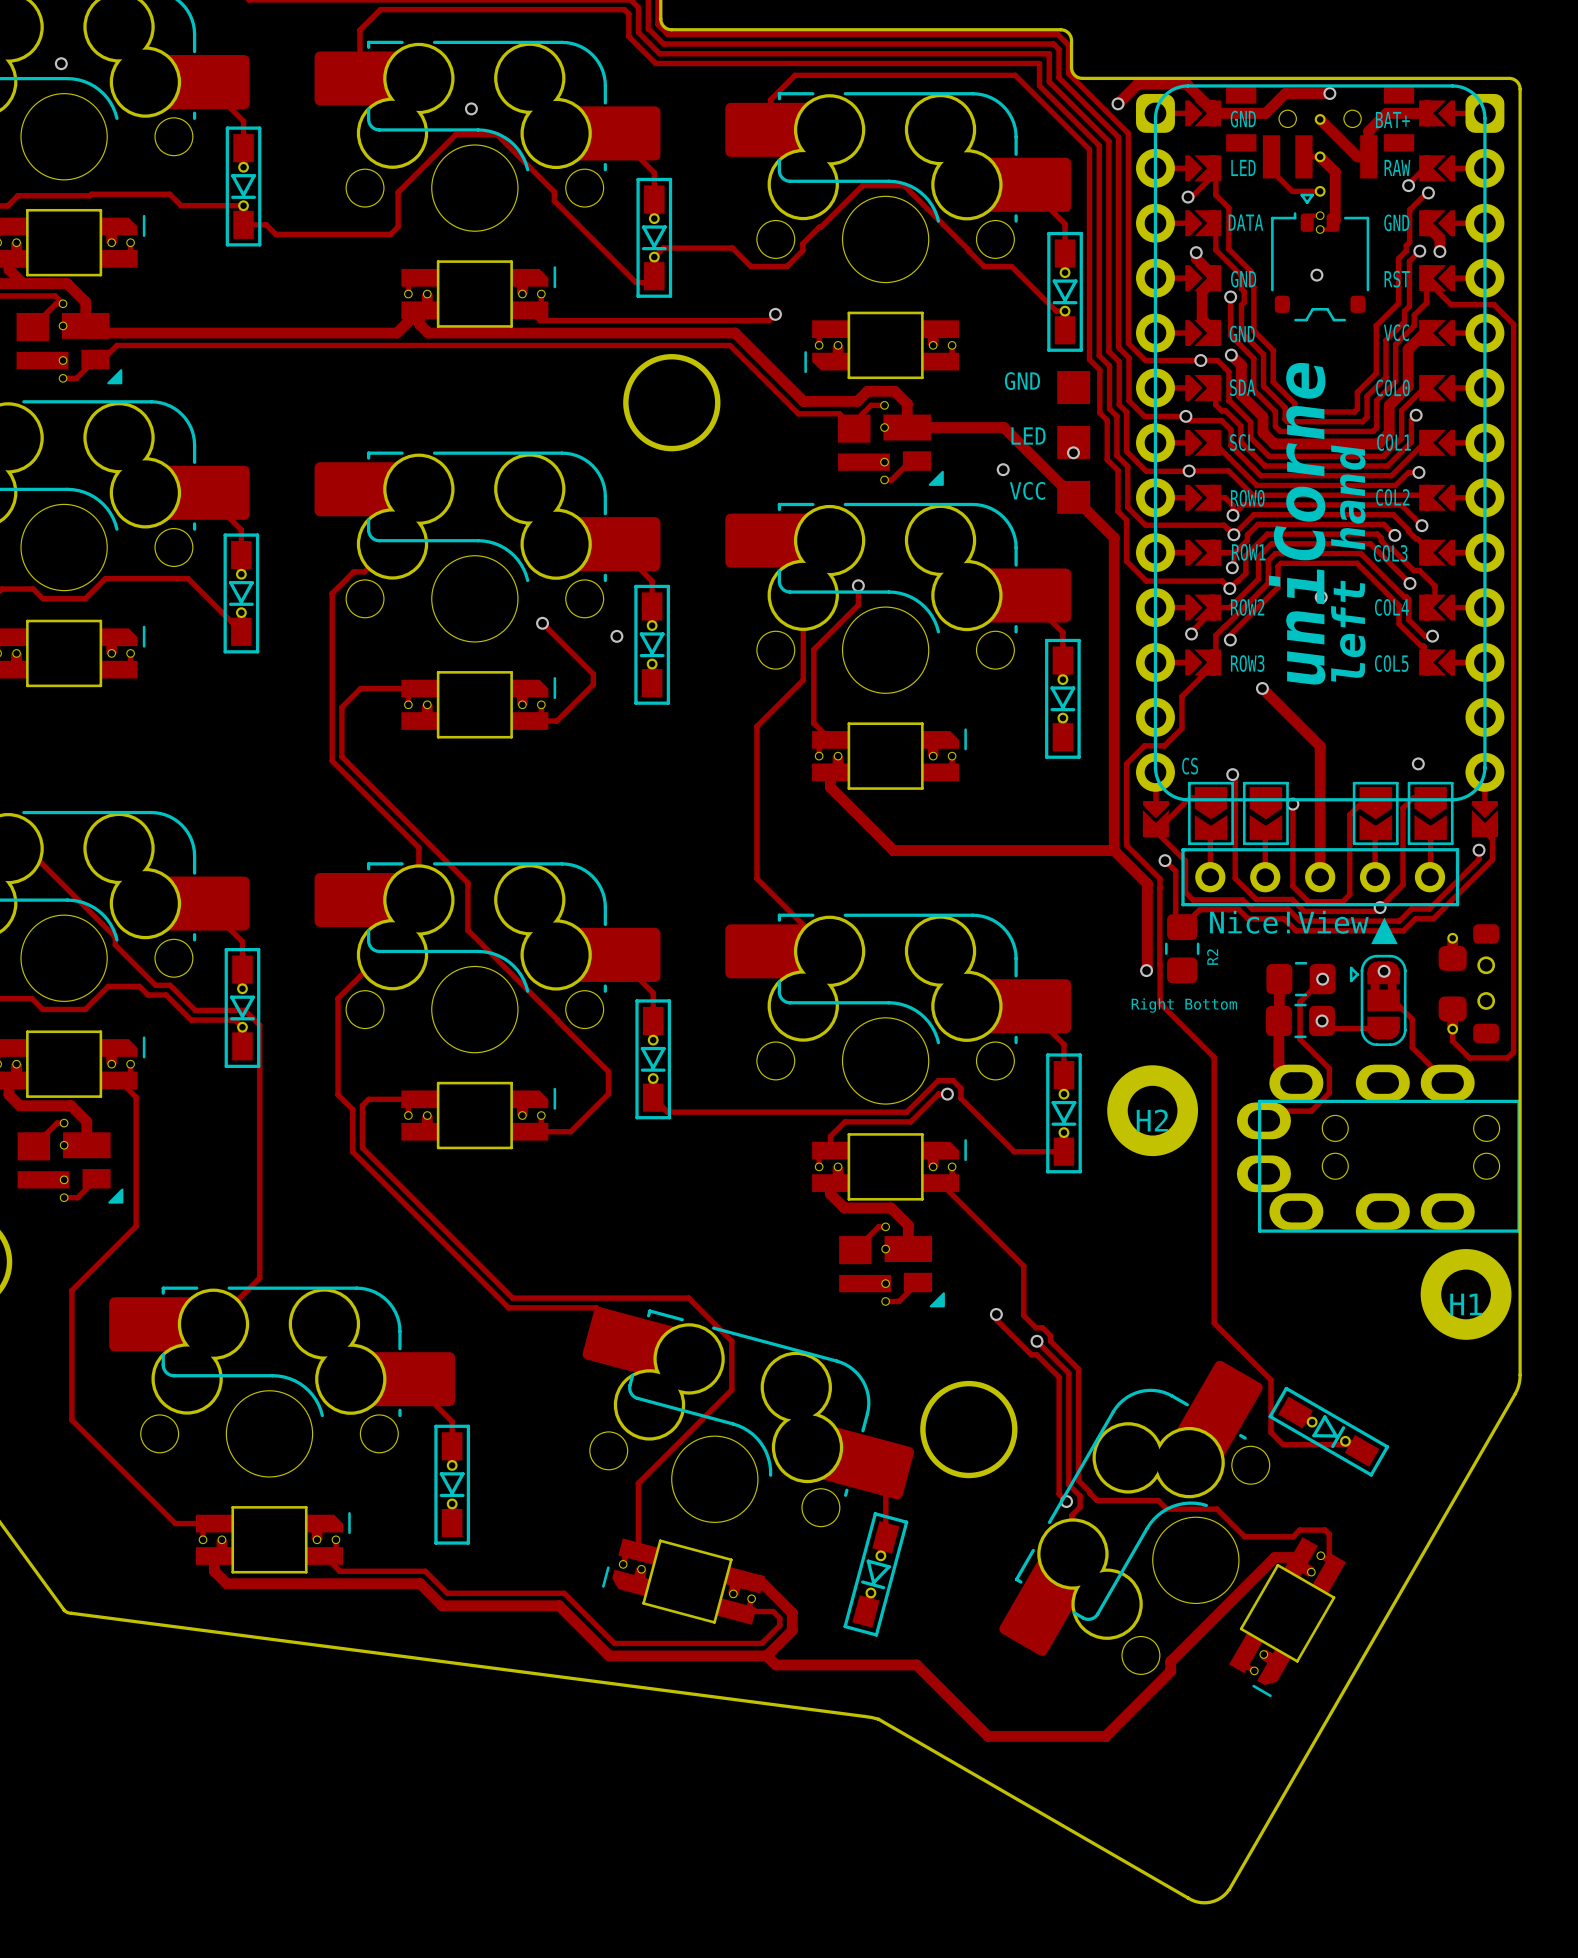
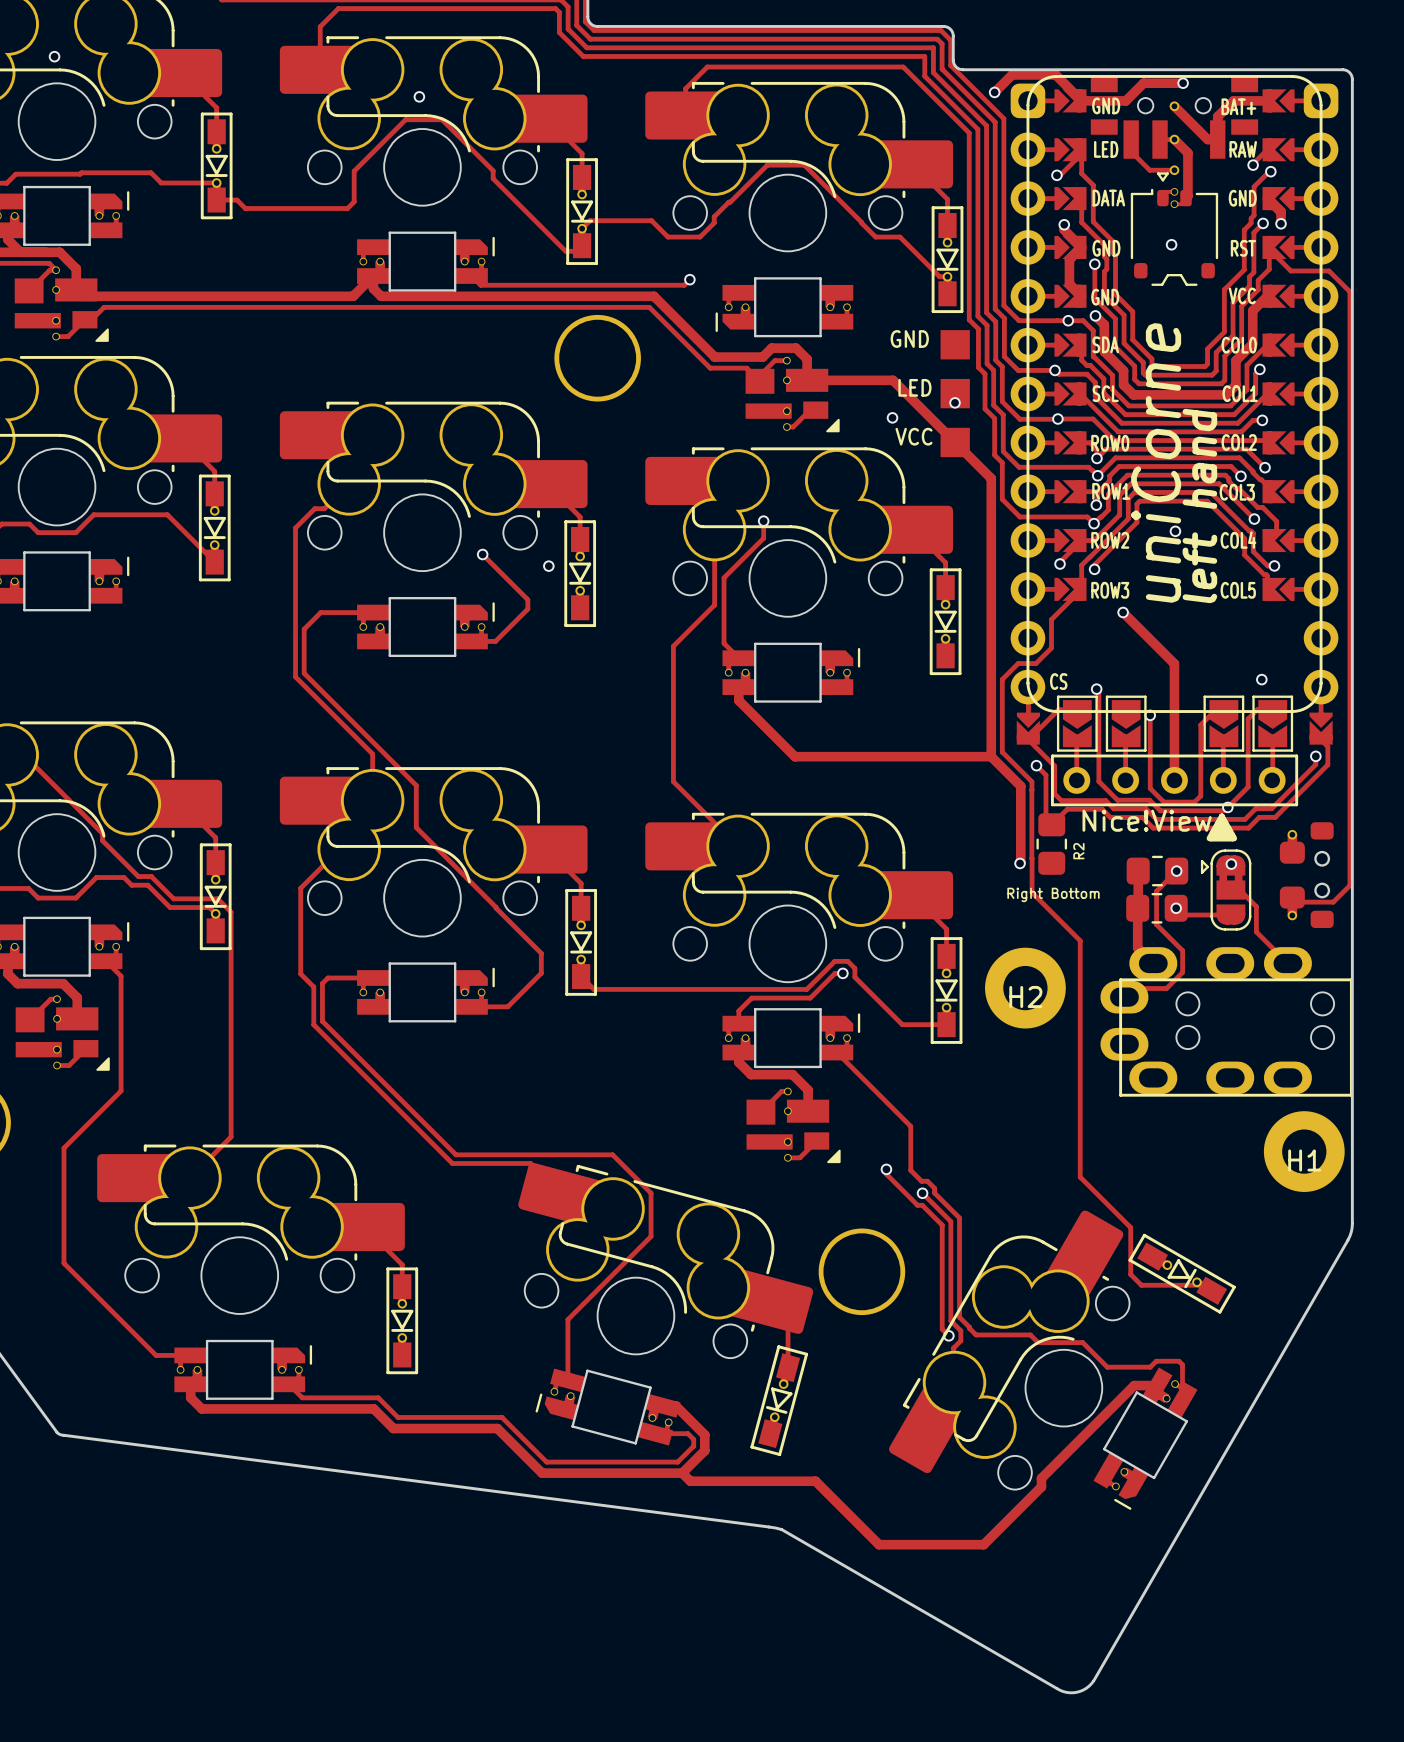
track: (1513, 324) (1513, 1051) (1507, 1057) (1469, 1057) (1452, 1041) (1452, 1029) -> (1346, 288) (1349, 291) (1349, 885) (1333, 902) (1296, 902) (1292, 897)

